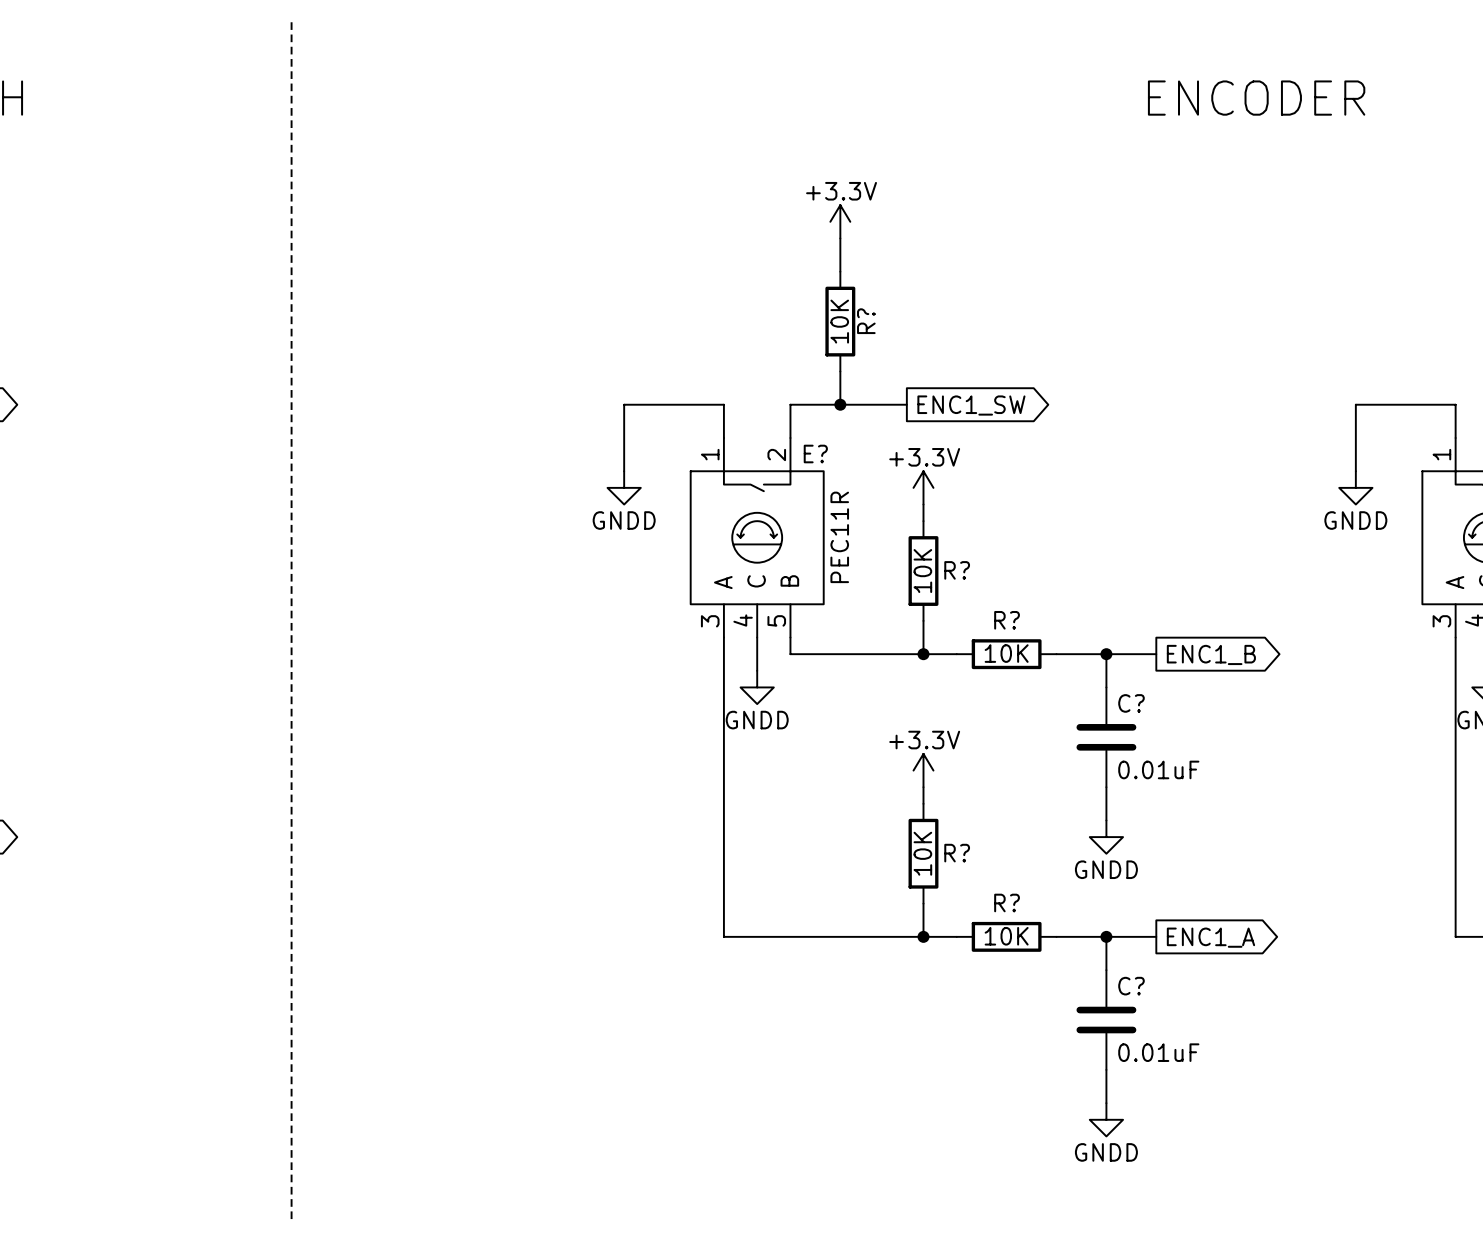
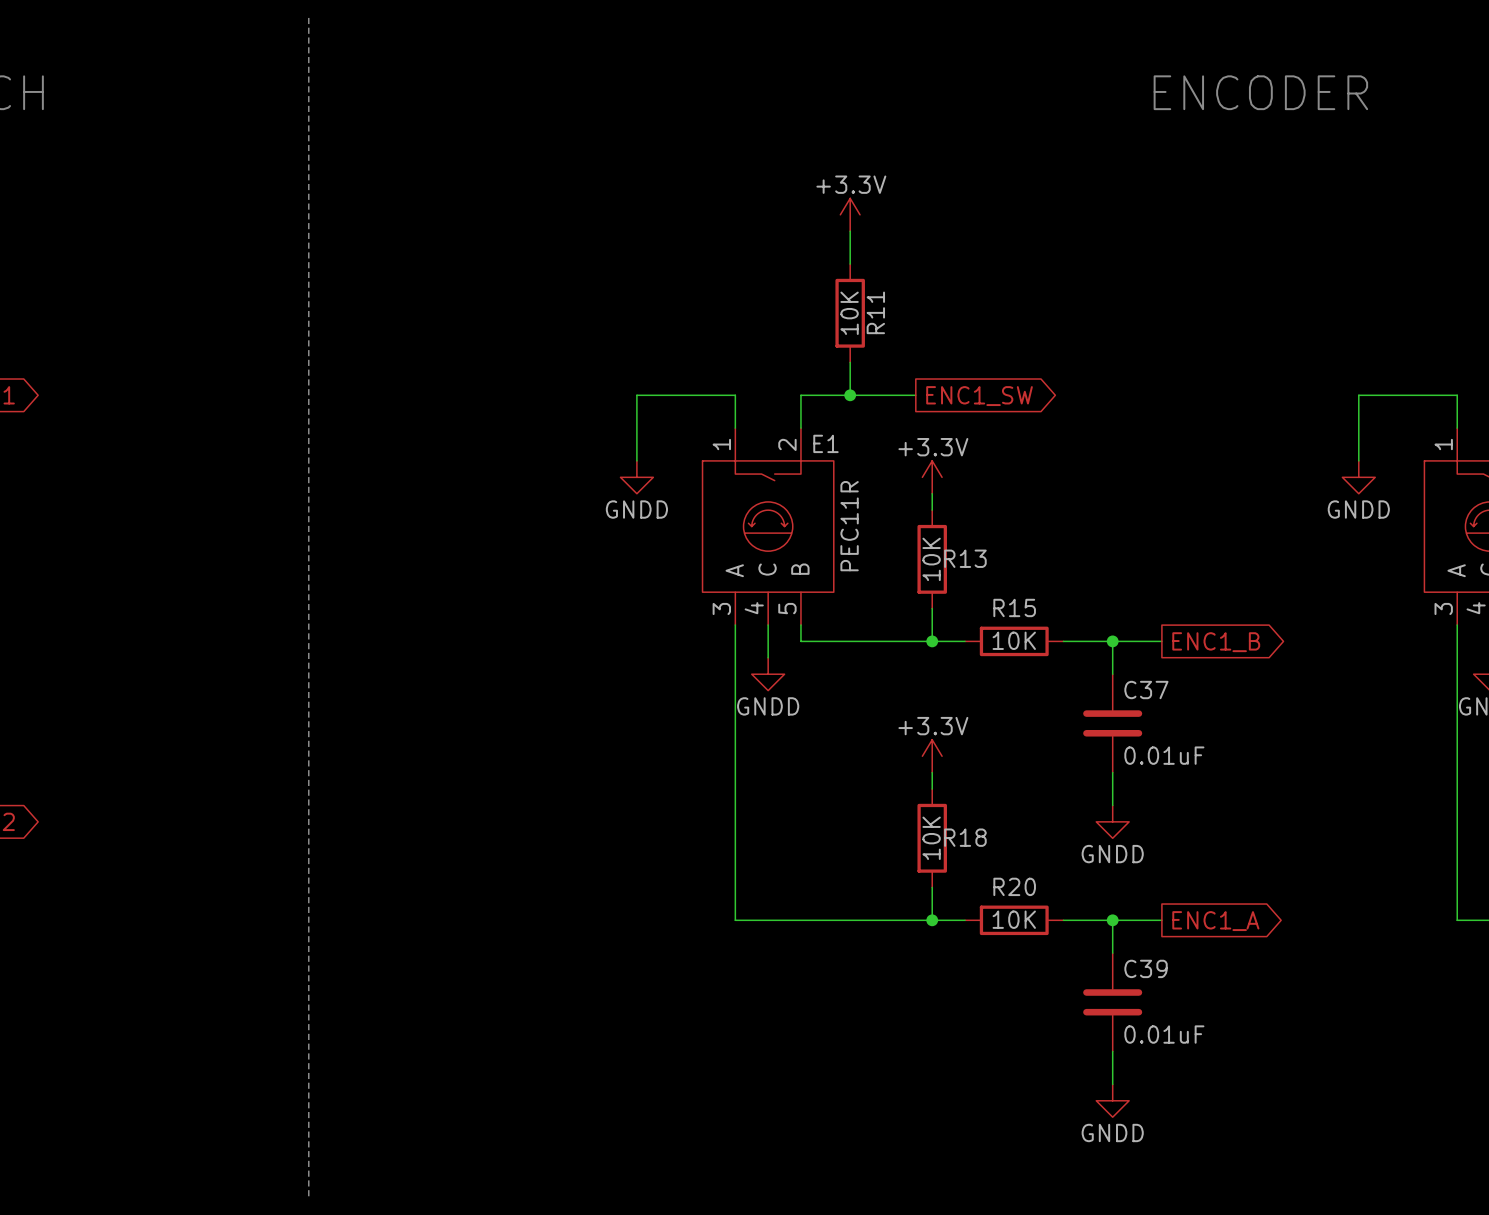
R? name: R? (866, 321) -> R11 (875, 312)
E? name: E? (815, 454) -> E1 (825, 443)
R? name: R? (957, 570) -> R13 (965, 558)
R? name: R? (1007, 620) -> R15 (1014, 607)
C? name: C? (1131, 703) -> C37 (1146, 690)
R? name: R? (957, 853) -> R18 (965, 837)
R? name: R? (1007, 902) -> R20 (1014, 886)
C? name: C? (1131, 986) -> C39 (1146, 968)

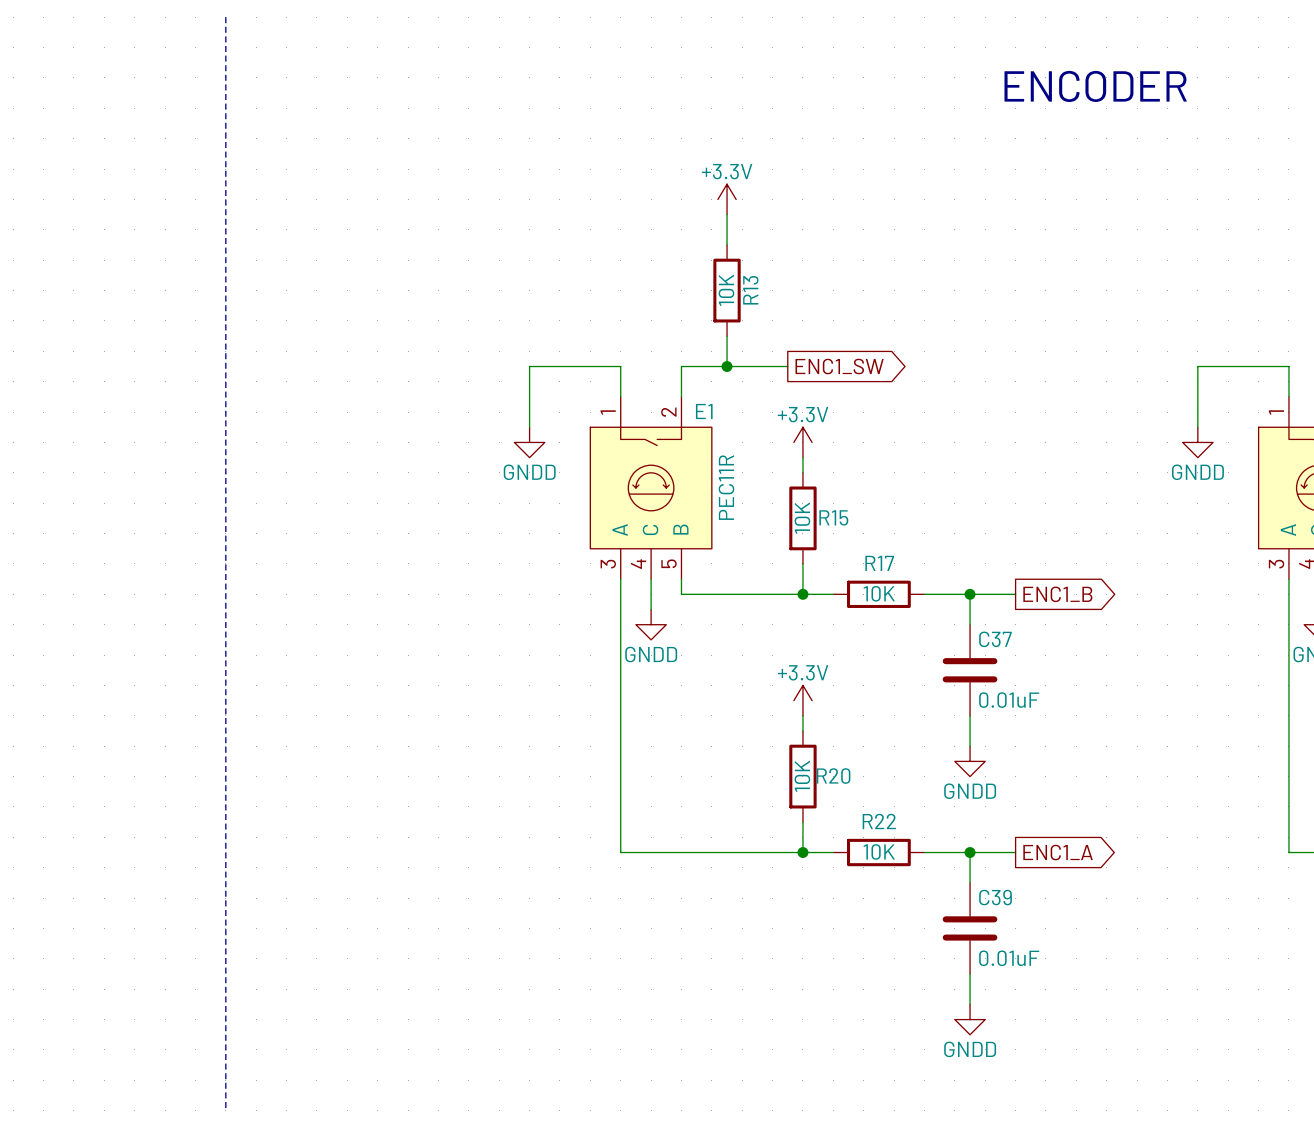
R11 name: R11 (875, 312) -> R13 (750, 290)
R13 name: R13 (965, 558) -> R15 (833, 517)
R15 name: R15 (1014, 607) -> R17 (879, 563)
R18 name: R18 (965, 837) -> R20 (833, 776)
R20 name: R20 (1014, 886) -> R22 (879, 821)

